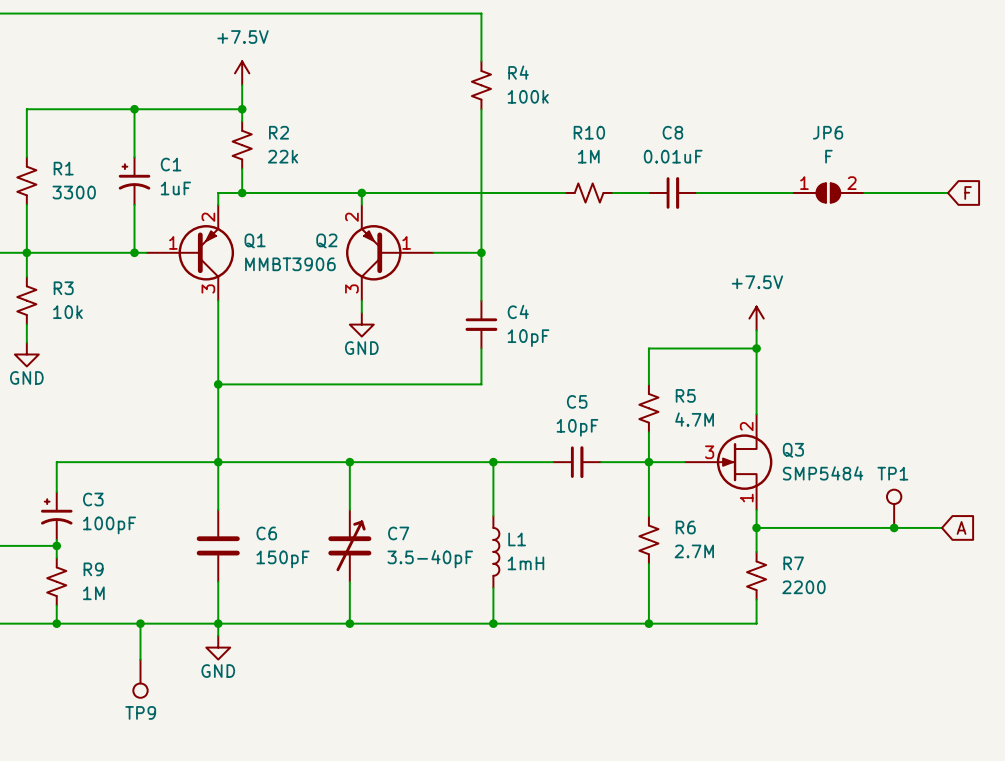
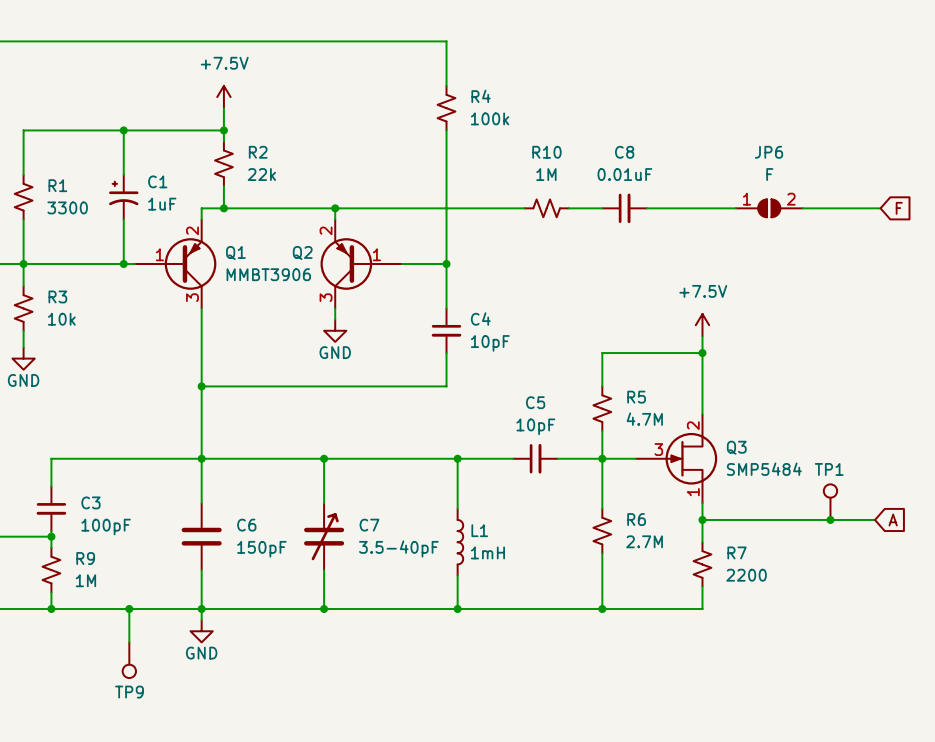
C3 symbol: [40, 492, 73, 540] -> [36, 486, 67, 532]

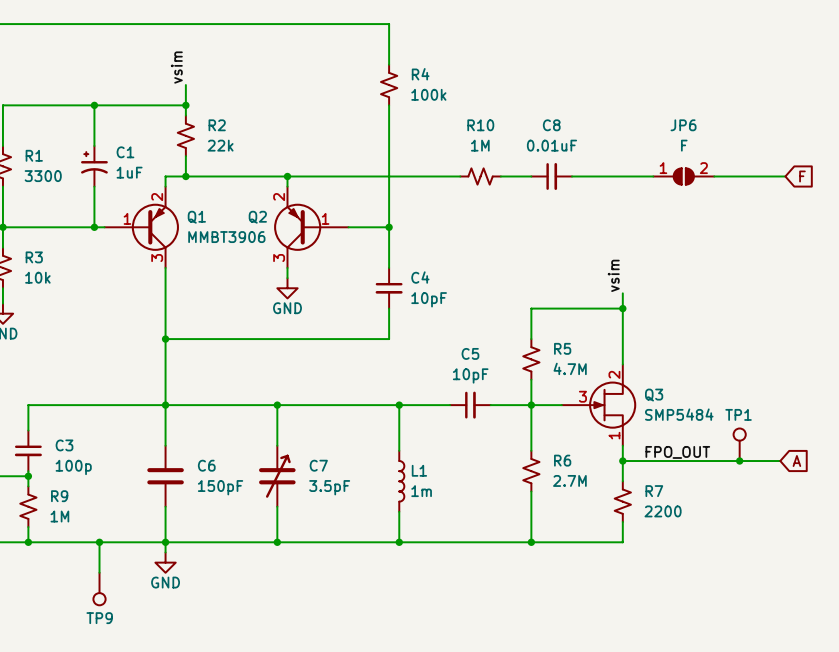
label: none -> vsim (176, 67)
power symbol: +7.5V (223, 97) -> none
label: none -> vsim (613, 275)
power symbol: +7.5V (702, 325) -> none
label: none -> FPO_OUT (677, 452)
C3 value: 100pF (106, 527) -> 100p (73, 467)
C7 value: 3.5-40pF (398, 548) -> 3.5pF (329, 487)
L1 value: 1mH (487, 552) -> 1m (421, 491)

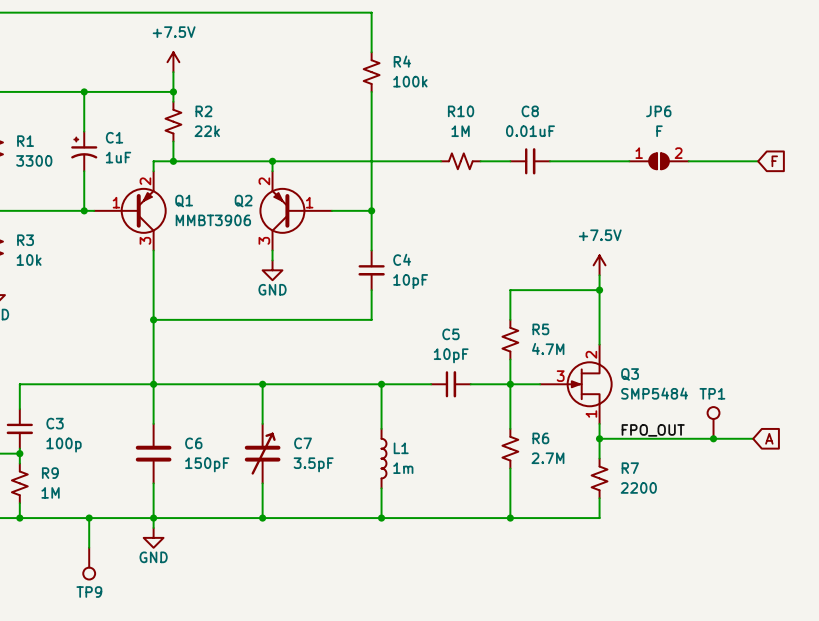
label: vsim (176, 67) -> none
power symbol: none -> +7.5V (173, 62)
label: vsim (613, 275) -> none
power symbol: none -> +7.5V (599, 265)

